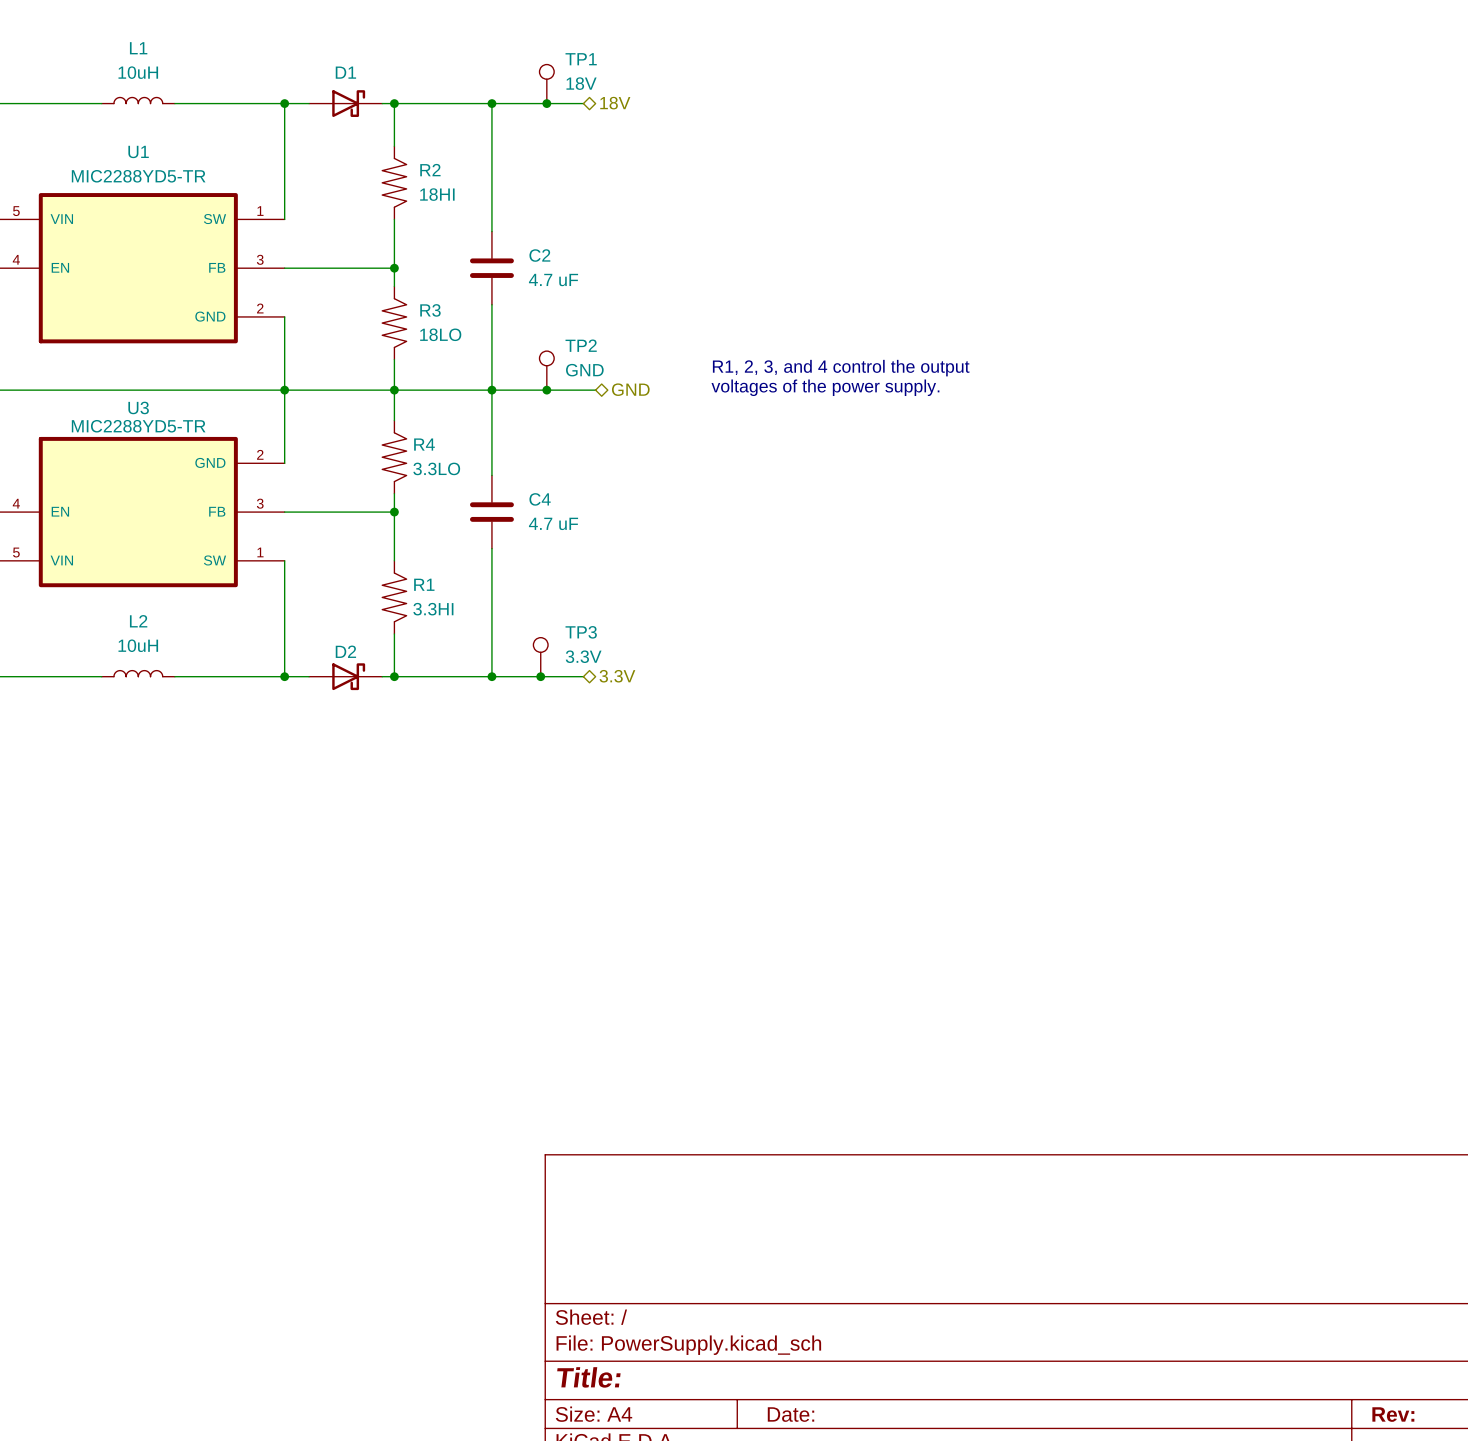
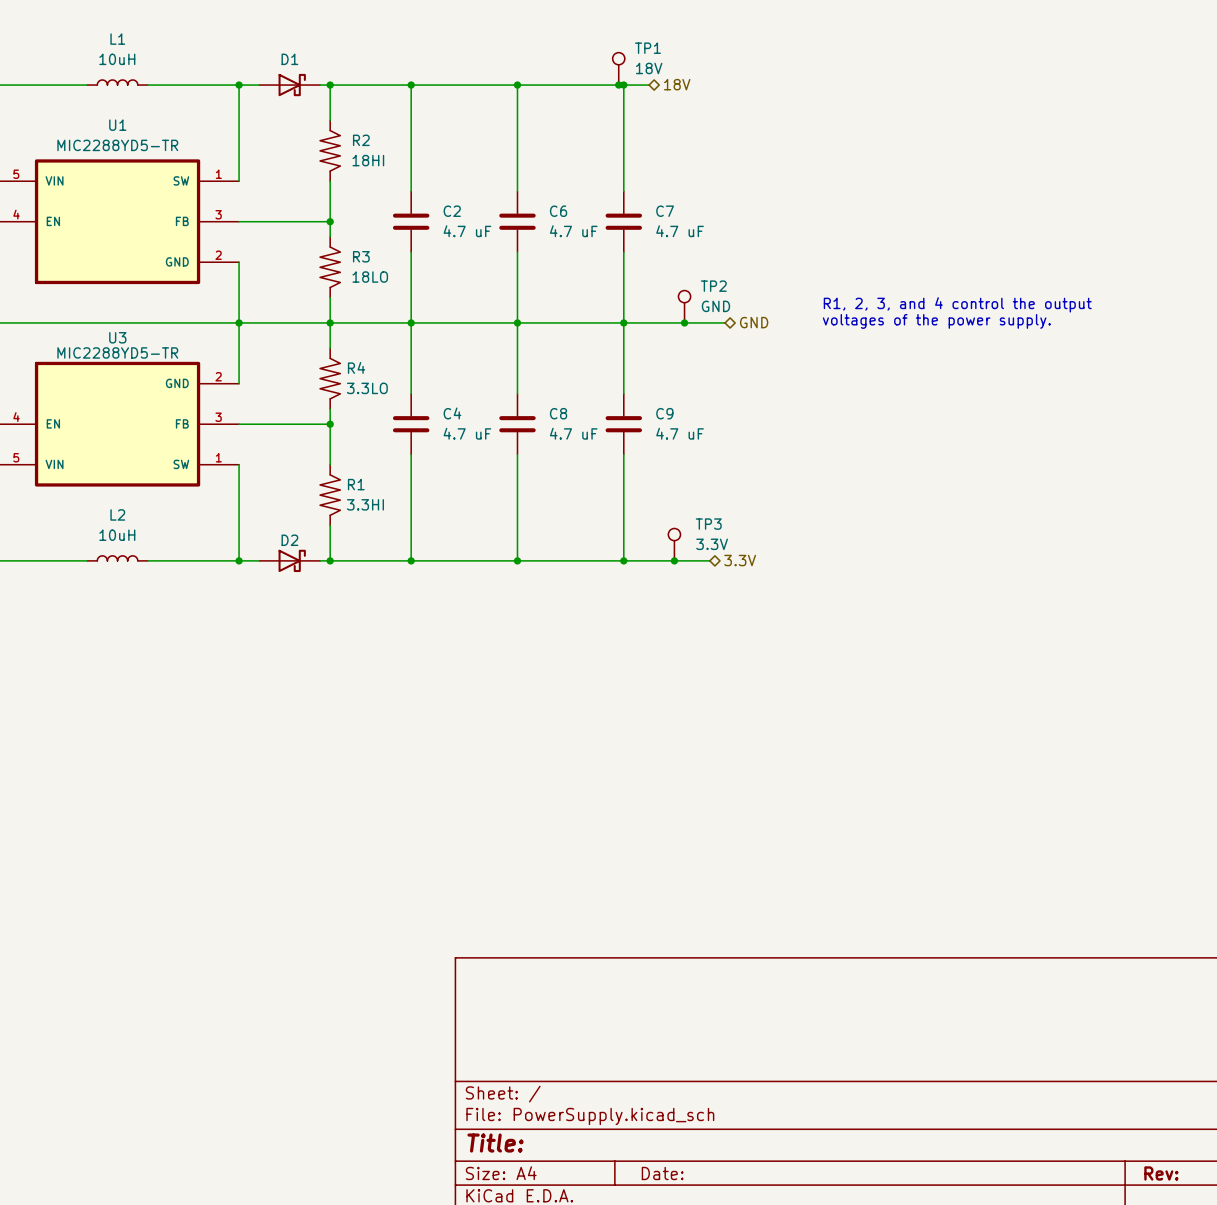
TP1 position: (546, 84) -> (618, 68)
junction: (546, 103) -> none
wire: none -> (487, 85) (649, 85)
hierarchical label position: 18V (615, 103) -> 18V (677, 84)
wire: none -> (517, 85) (517, 191)
junction: none -> (517, 85)
junction: none -> (618, 85)
wire: none -> (623, 85) (623, 191)
junction: none -> (623, 85)
C6: none -> 4.7 uF (517, 221)
C7: none -> 4.7 uF (623, 221)
wire: none -> (517, 252) (517, 393)
wire: none -> (623, 252) (623, 393)
text: R1, 2, 3, and 4 control the output (841, 368) -> none
text: none -> R1, 2, 3, and 4 control the output (957, 304)
TP2 position: (546, 370) -> (684, 306)
text: voltages of the power supply. (825, 387) -> none
text: none -> voltages of the power supply. (936, 321)
hierarchical label: GND (630, 389) -> none
hierarchical label: none -> GND (754, 322)
junction: (546, 390) -> none
wire: none -> (497, 322) (725, 322)
junction: none -> (517, 322)
junction: none -> (623, 322)
junction: none -> (684, 322)
C8: none -> 4.7 uF (517, 424)
C9: none -> 4.7 uF (623, 424)
wire: none -> (517, 454) (517, 560)
wire: none -> (623, 454) (623, 560)
TP3 position: (540, 657) -> (674, 544)
junction: (540, 676) -> none
wire: none -> (487, 560) (709, 560)
hierarchical label: 3.3V (617, 676) -> none
junction: none -> (517, 560)
junction: none -> (623, 560)
junction: none -> (674, 560)
hierarchical label: none -> 3.3V (740, 560)

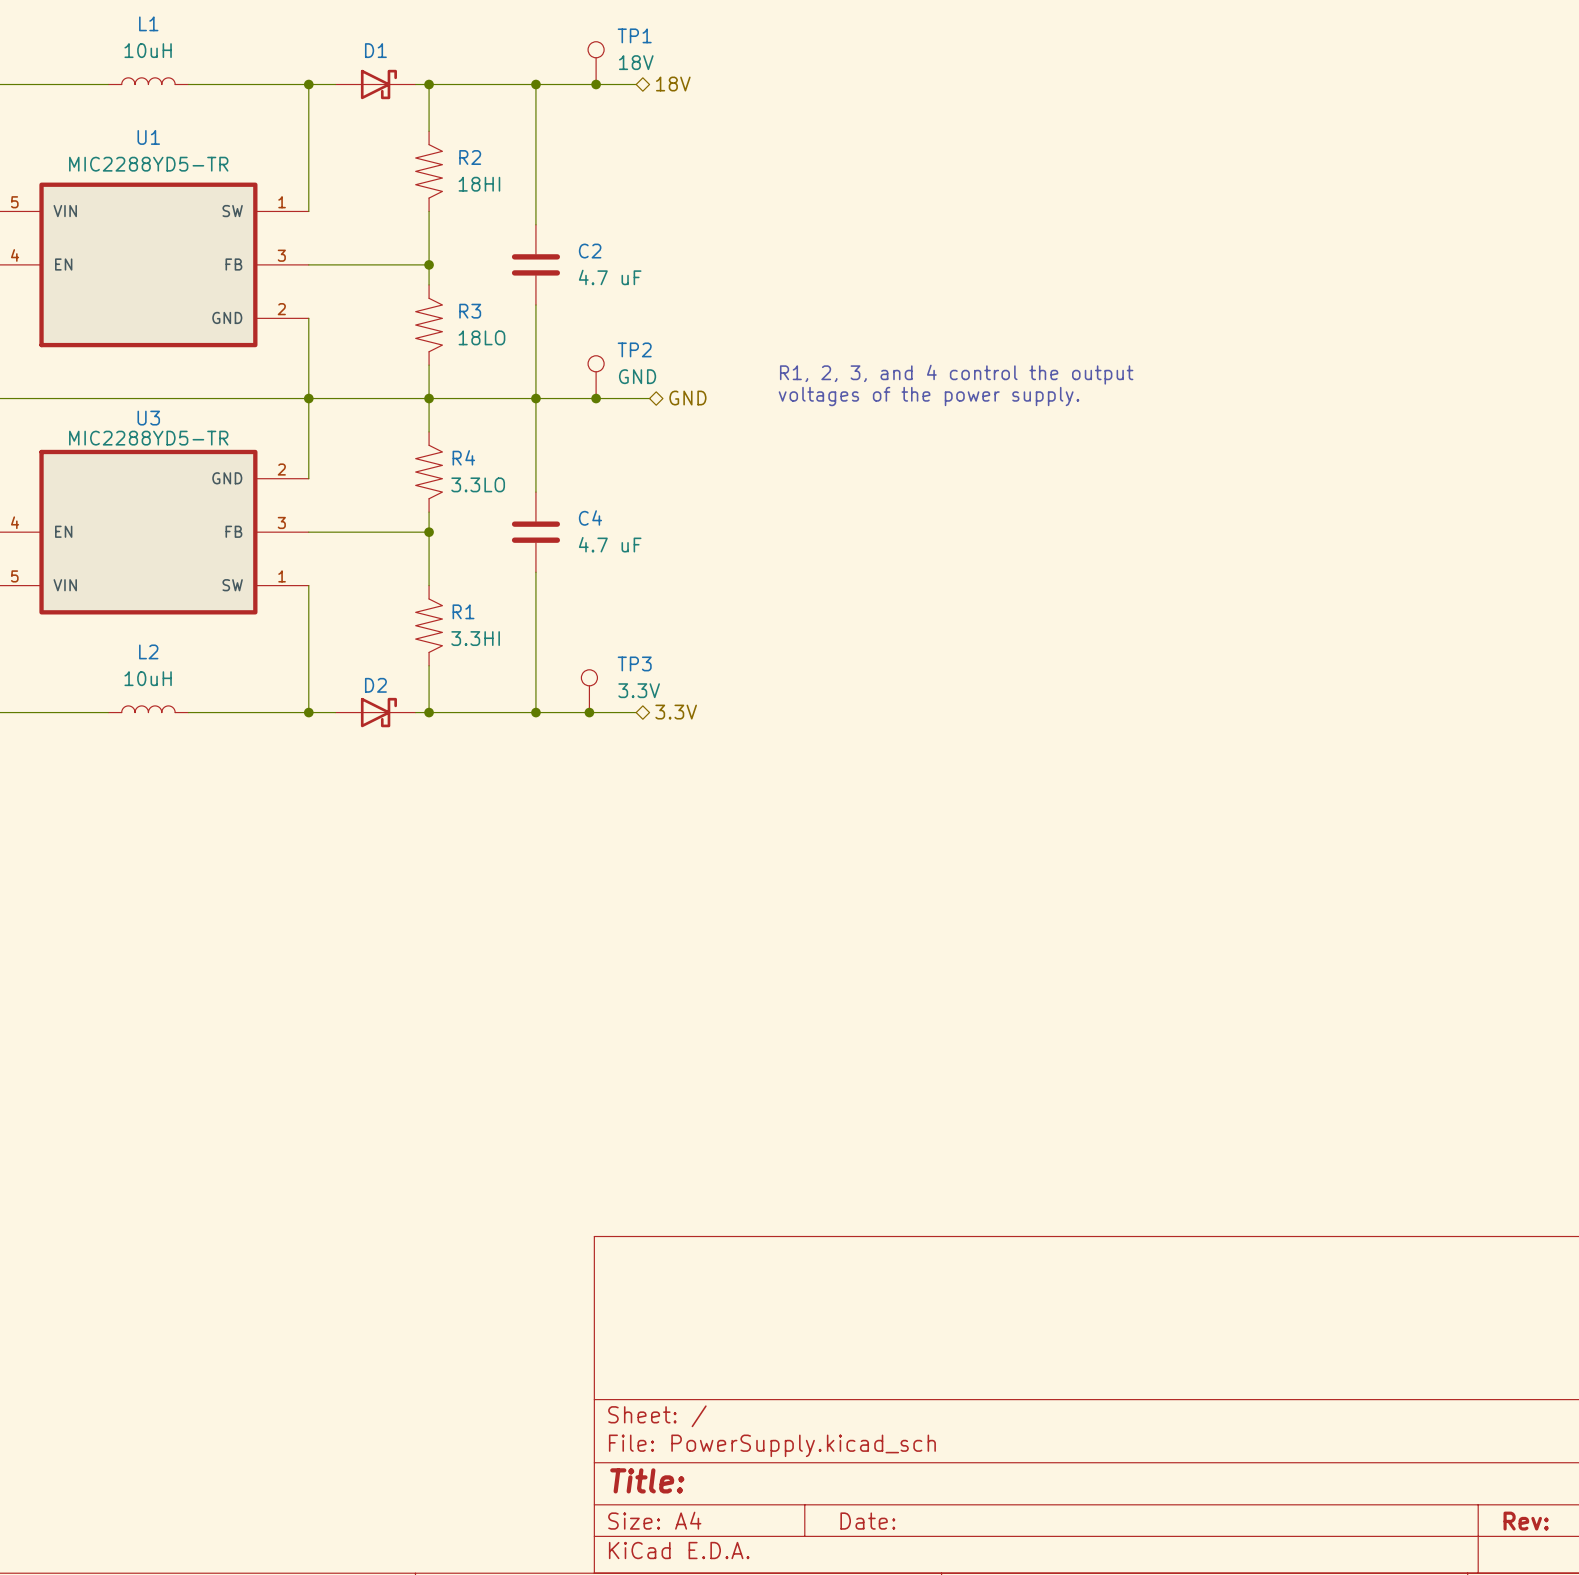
TP1 position: (618, 68) -> (596, 63)
hierarchical label position: 18V (677, 84) -> 18V (673, 84)
junction: none -> (596, 84)
wire: (487, 85) (649, 85) -> none
wire: (517, 85) (517, 191) -> none
junction: (517, 85) -> none
junction: (618, 85) -> none
wire: (623, 85) (623, 191) -> none
junction: (623, 85) -> none
C6: 4.7 uF (517, 221) -> none
C7: 4.7 uF (623, 221) -> none
wire: (517, 252) (517, 393) -> none
wire: (623, 252) (623, 393) -> none
text: none -> R1, 2, 3, and 4 control the output (956, 374)
text: R1, 2, 3, and 4 control the output (957, 304) -> none
TP2 position: (684, 306) -> (596, 377)
text: none -> voltages of the power supply. (928, 396)
text: voltages of the power supply. (936, 321) -> none
junction: none -> (596, 398)
wire: (497, 322) (725, 322) -> none
junction: (517, 322) -> none
hierarchical label: none -> GND (687, 398)
junction: (623, 322) -> none
junction: (684, 322) -> none
hierarchical label: GND (754, 322) -> none
C8: 4.7 uF (517, 424) -> none
C9: 4.7 uF (623, 424) -> none
wire: (517, 454) (517, 560) -> none
wire: (623, 454) (623, 560) -> none
TP3 position: (674, 544) -> (589, 691)
junction: none -> (589, 712)
wire: (487, 560) (709, 560) -> none
junction: (517, 560) -> none
hierarchical label: none -> 3.3V (676, 712)
junction: (623, 560) -> none
junction: (674, 560) -> none
hierarchical label: 3.3V (740, 560) -> none

